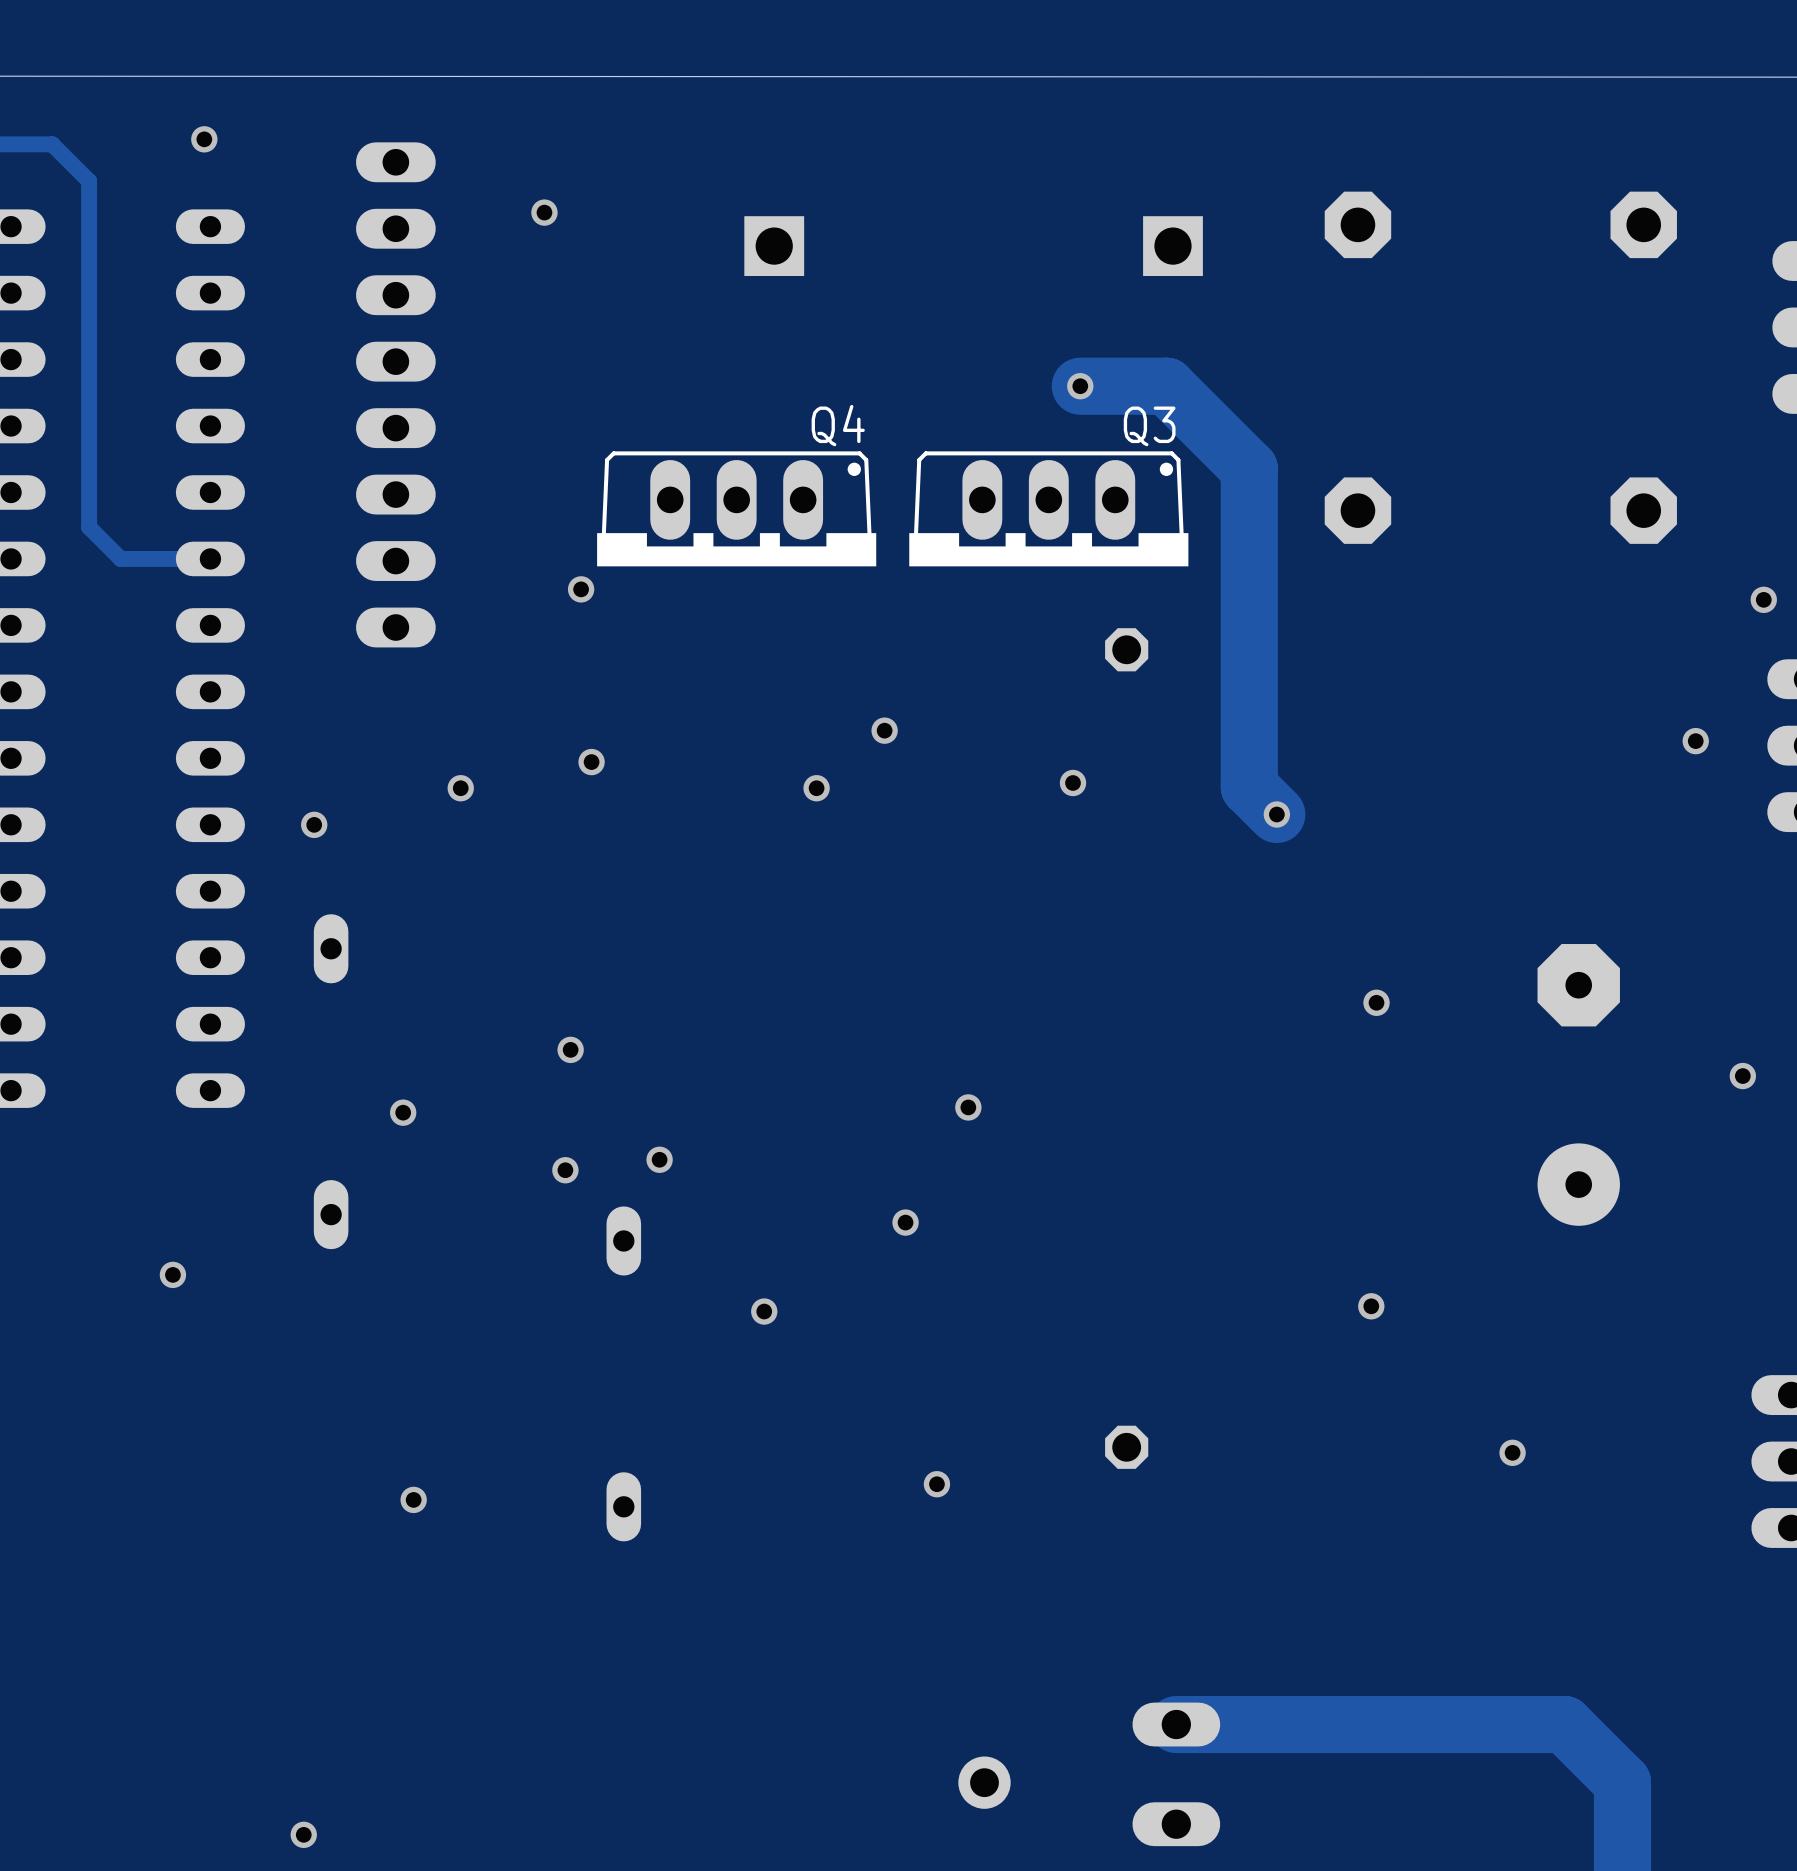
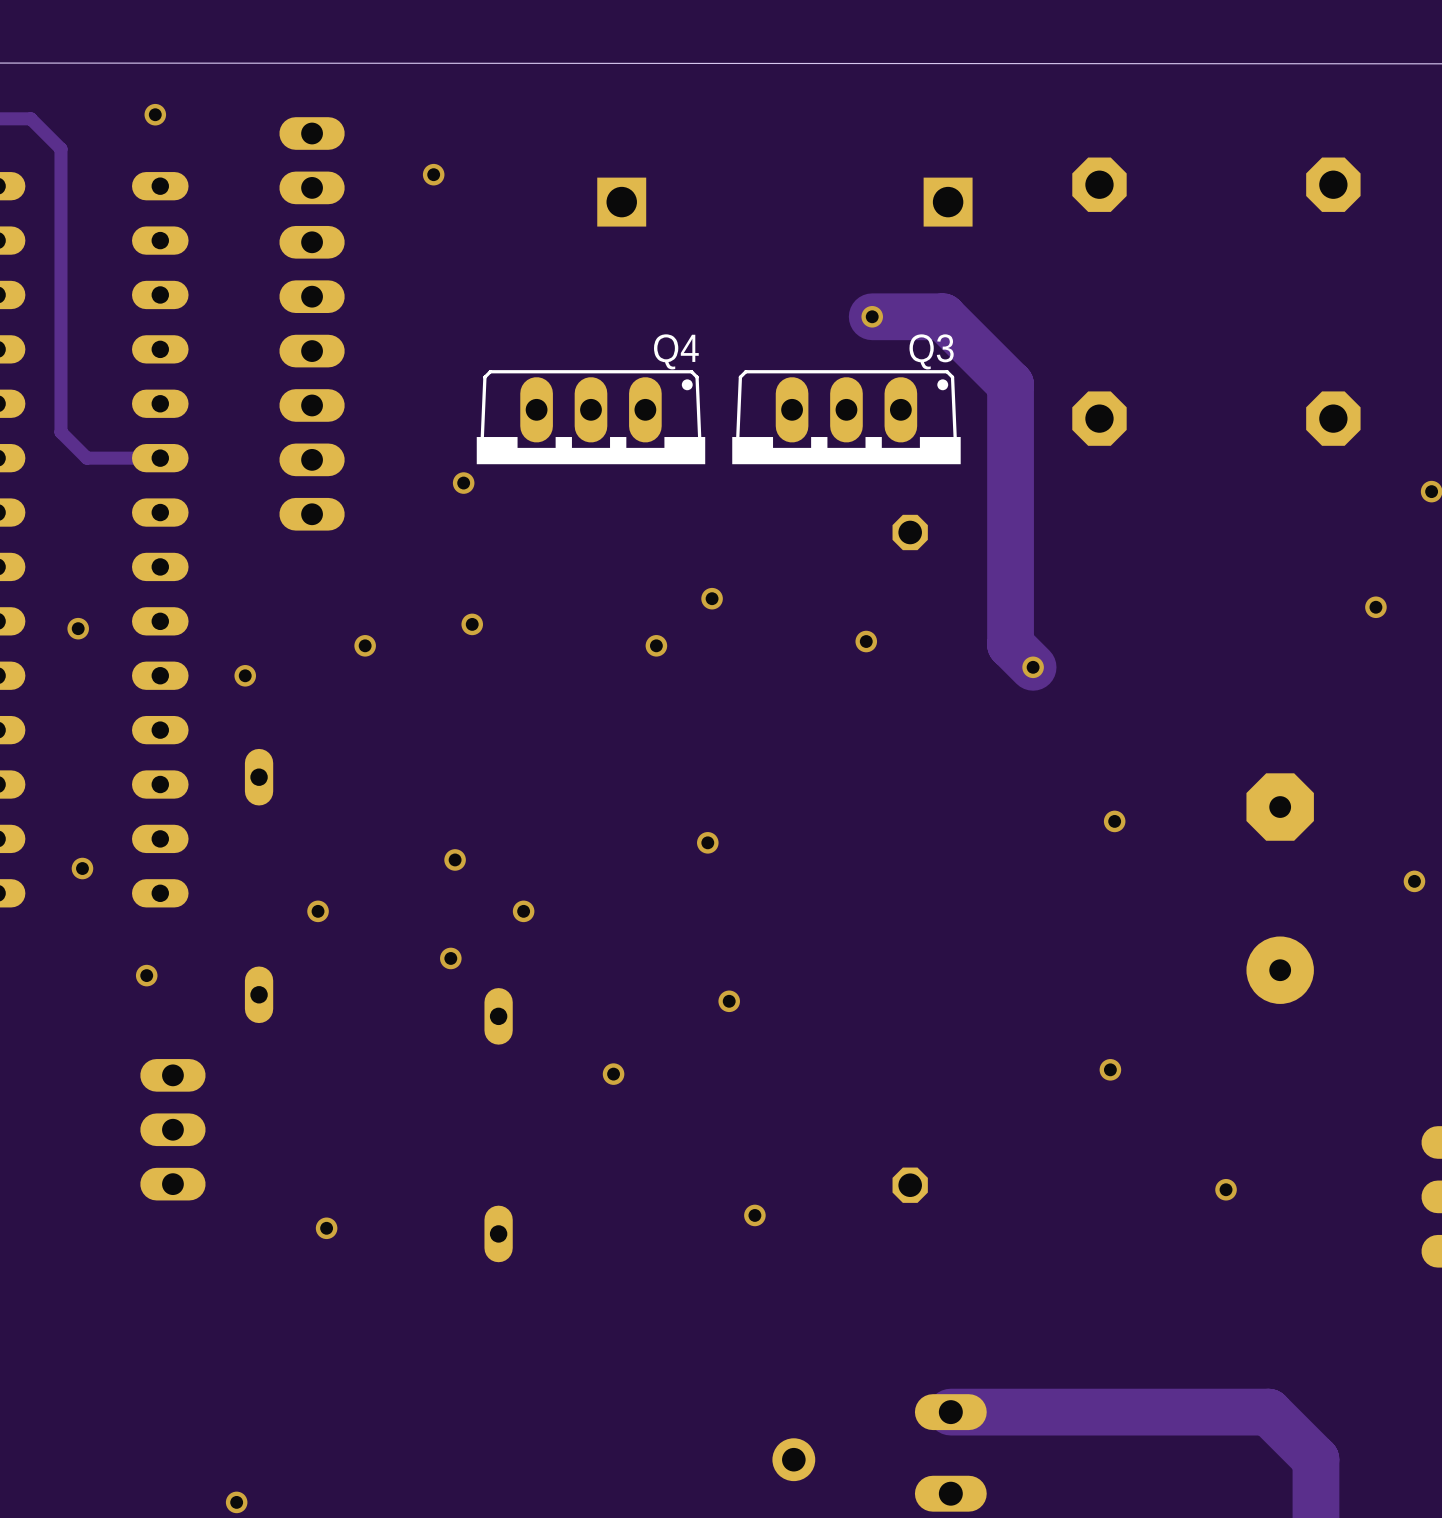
via: none -> (78, 628)
via: none -> (82, 868)
via position: (968, 1107) -> (707, 842)
via position: (659, 1159) -> (523, 911)
via position: (172, 1274) -> (146, 975)
part: none -> (172, 1129)

